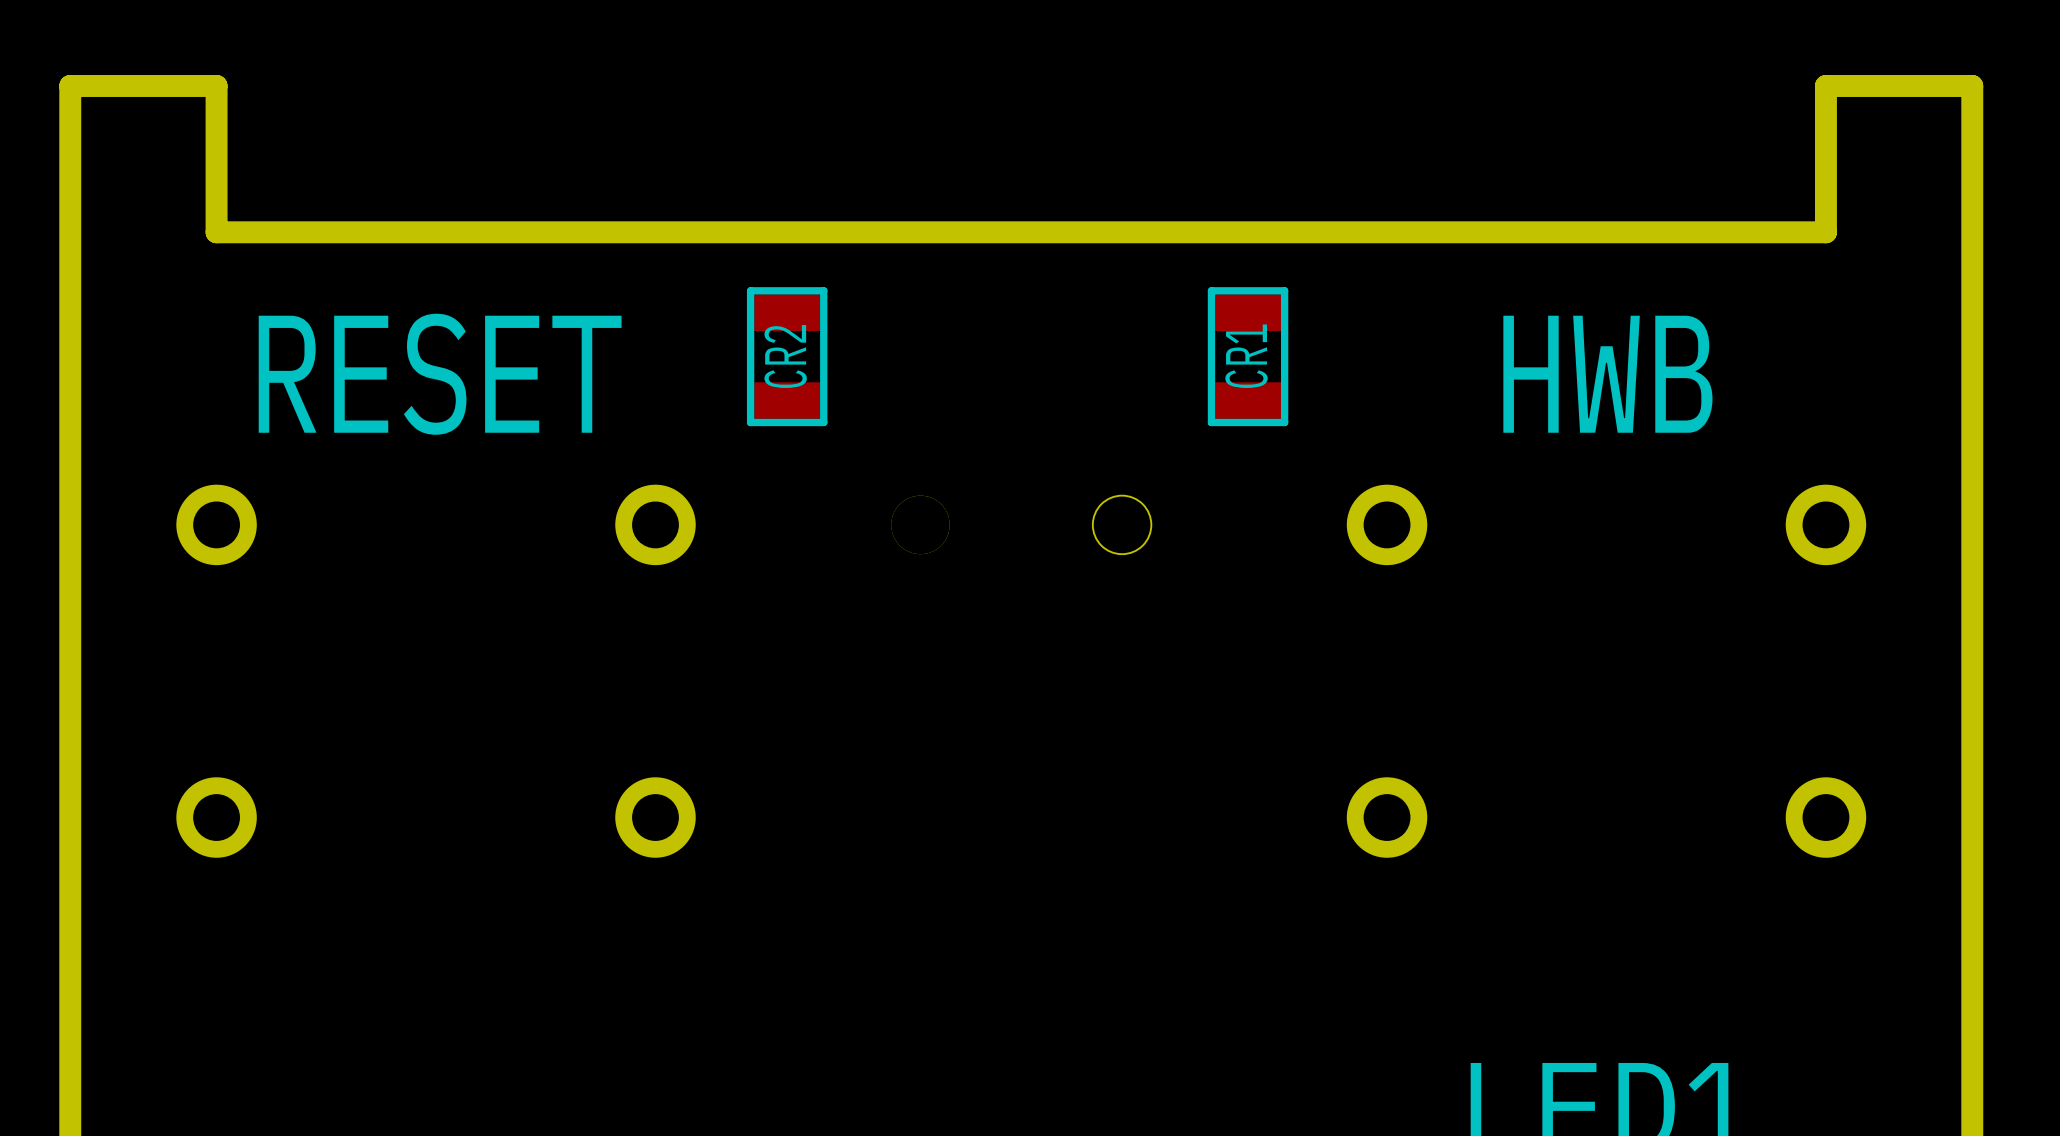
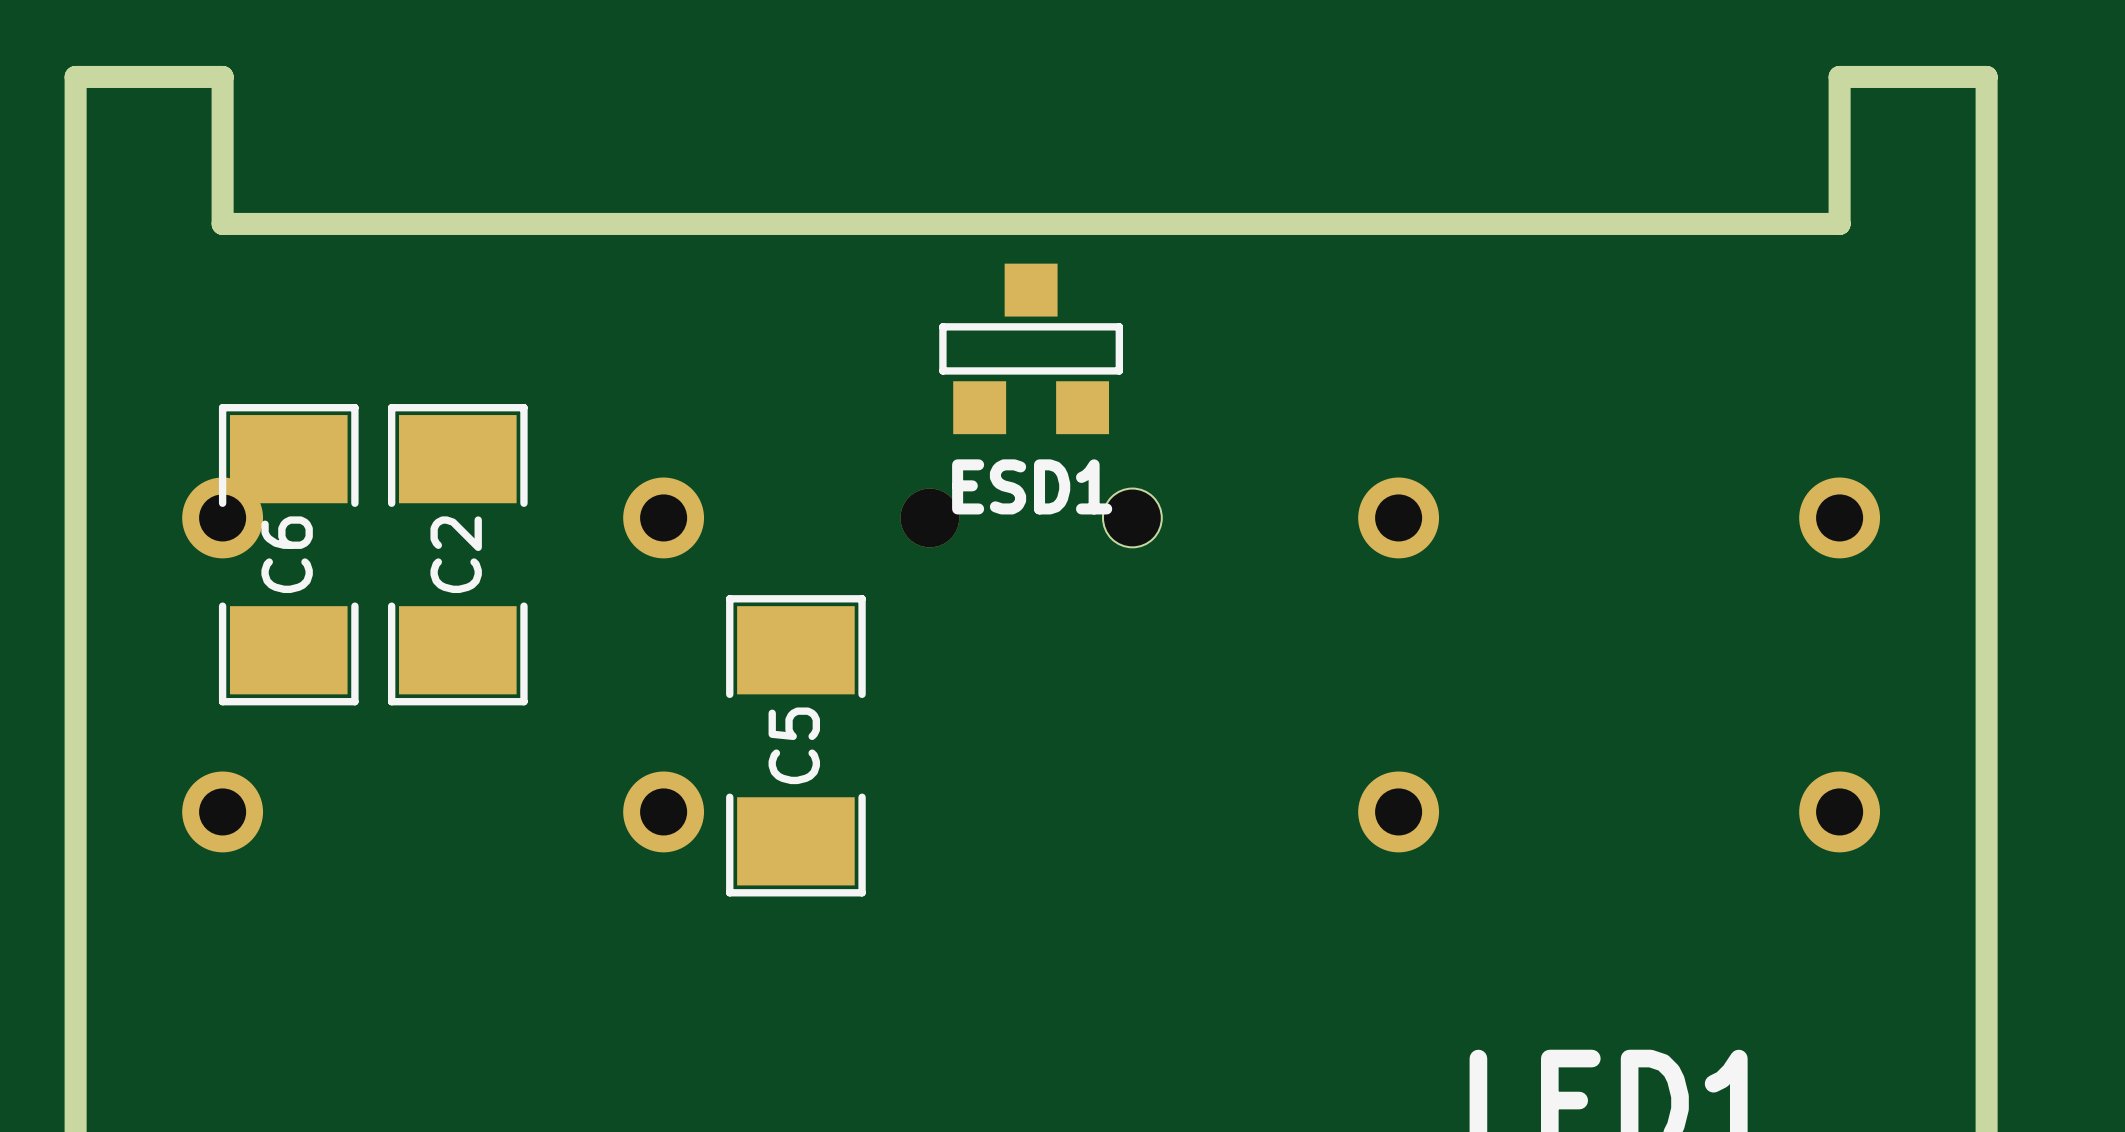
CR2: (787, 356) -> none
ESD1: none -> (1031, 348)
CR1: (1248, 356) -> none
text: RESET (440, 374) -> none
text: HWB (1607, 374) -> none
C6: none -> (288, 554)
C2: none -> (457, 554)
C5: none -> (795, 745)

